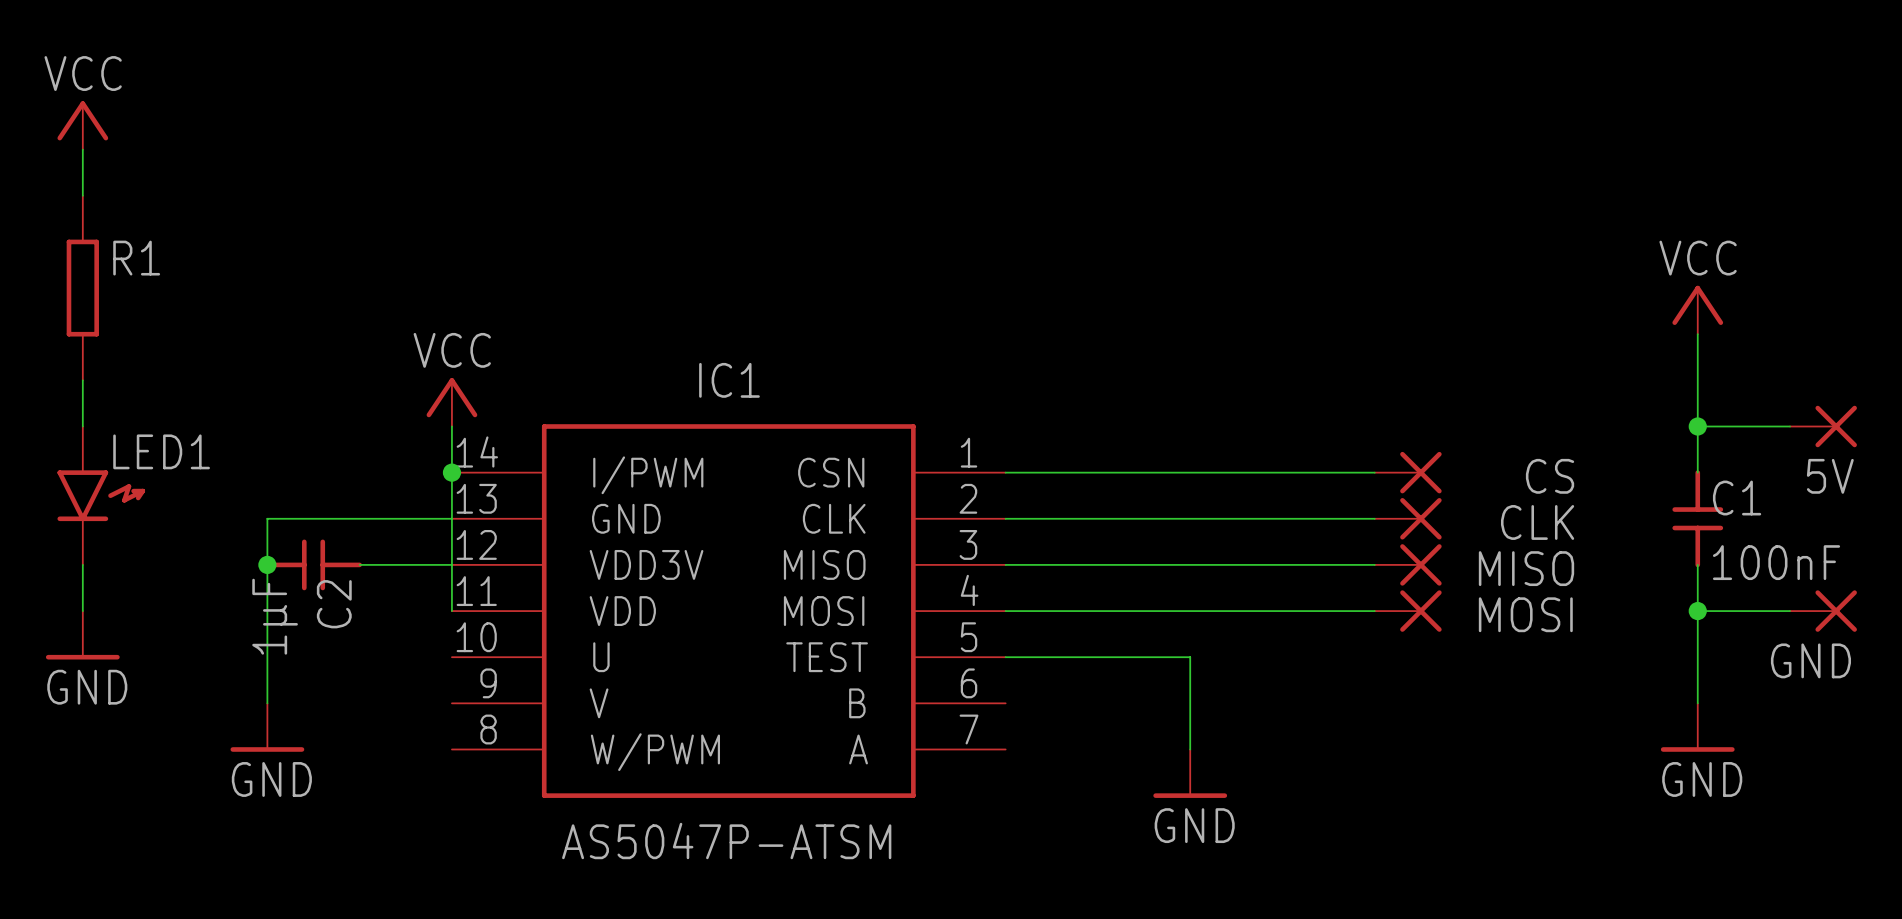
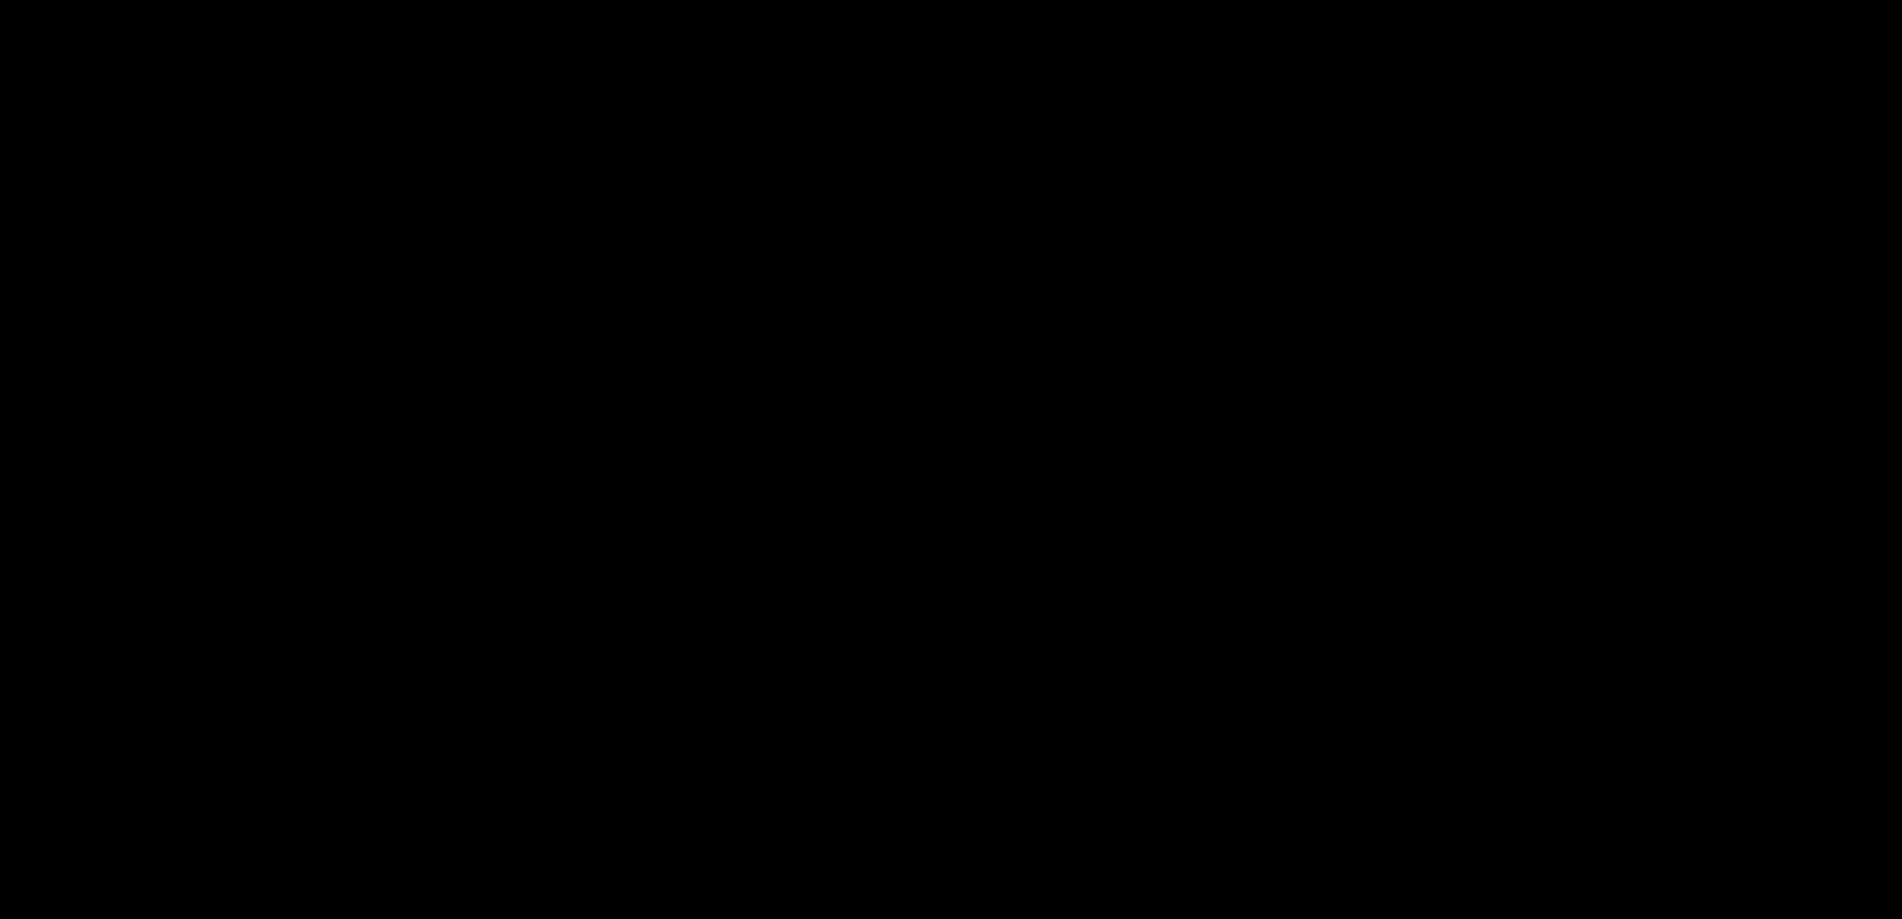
power symbol: VCC (82, 125) -> none
wire: (82, 149) (82, 195) -> none
R1: (82, 288) -> none
power symbol: VCC (1697, 309) -> none
wire: (1697, 334) (1697, 472) -> none
wire: (82, 380) (82, 426) -> none
power symbol: VCC (451, 402) -> none
wire: (451, 426) (451, 611) -> none
wire: (1697, 426) (1790, 426) -> none
junction: (1697, 426) -> none
5V: (1823, 426) -> none
junction: (451, 472) -> none
wire: (1005, 472) (1374, 472) -> none
CS: (1408, 472) -> none
LED1: (101, 495) -> none
wire: (451, 518) (267, 518) (267, 703) -> none
wire: (1005, 518) (1374, 518) -> none
CLK: (1408, 518) -> none
C1: 100nF (1697, 518) -> none
wire: (82, 564) (82, 611) -> none
junction: (267, 564) -> none
C2: 1µF (313, 564) -> none
wire: (359, 564) (451, 564) -> none
wire: (1005, 564) (1374, 564) -> none
MISO: (1408, 564) -> none
wire: (1697, 564) (1697, 703) -> none
IC1: AS5047P-ATSM (728, 611) -> none
wire: (1005, 611) (1374, 611) -> none
MOSI: (1408, 611) -> none
wire: (1697, 611) (1790, 611) -> none
junction: (1697, 611) -> none
GND: (1823, 611) -> none
power symbol: GND (82, 635) -> none
wire: (1005, 657) (1190, 657) (1190, 749) -> none
power symbol: GND (267, 727) -> none
power symbol: GND (1697, 727) -> none
power symbol: GND (1190, 773) -> none

